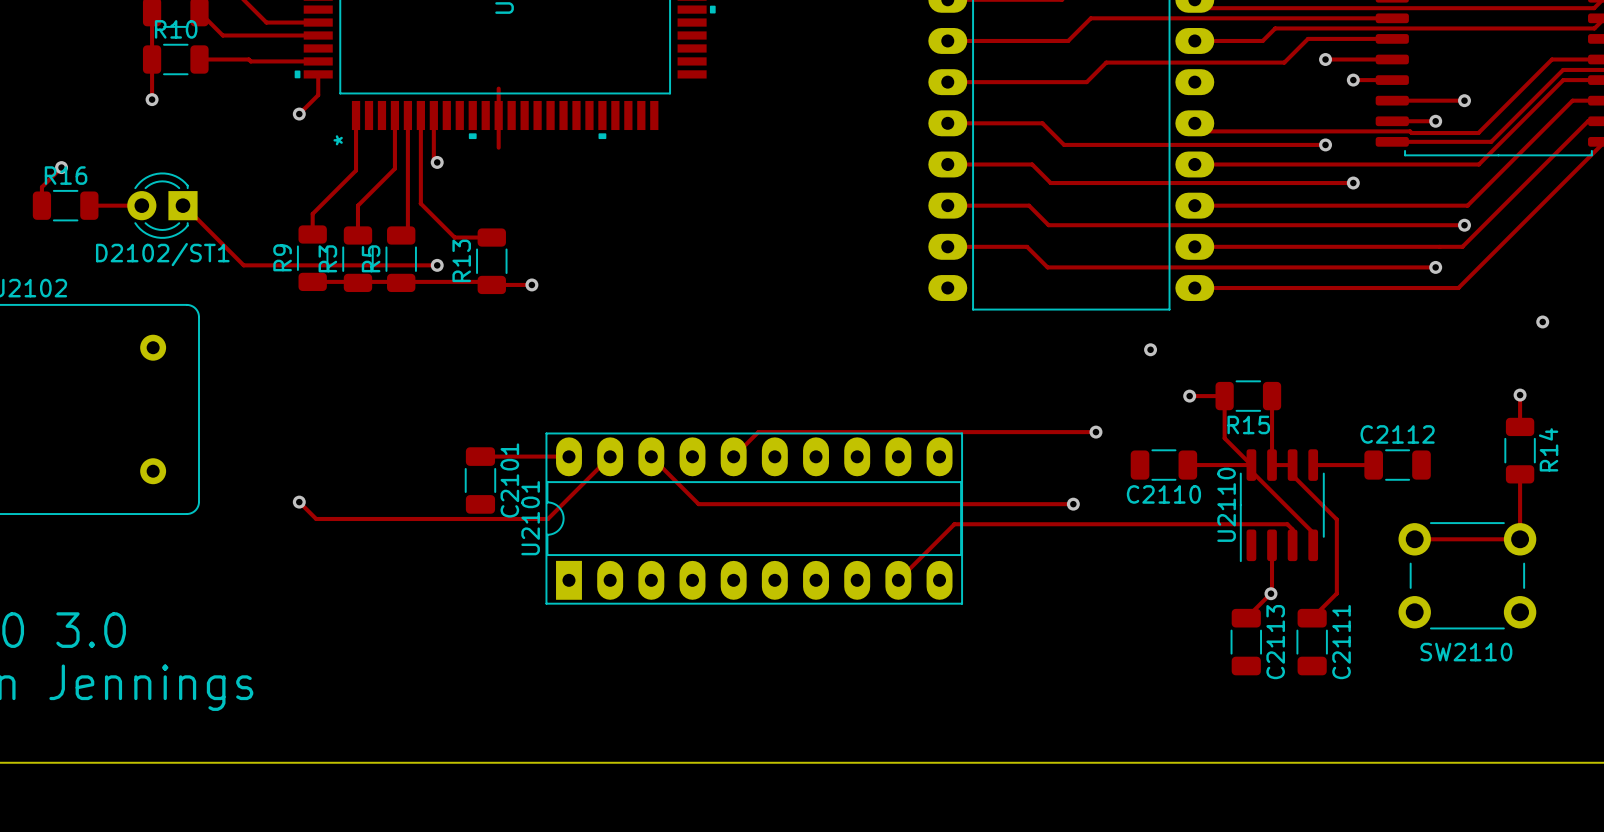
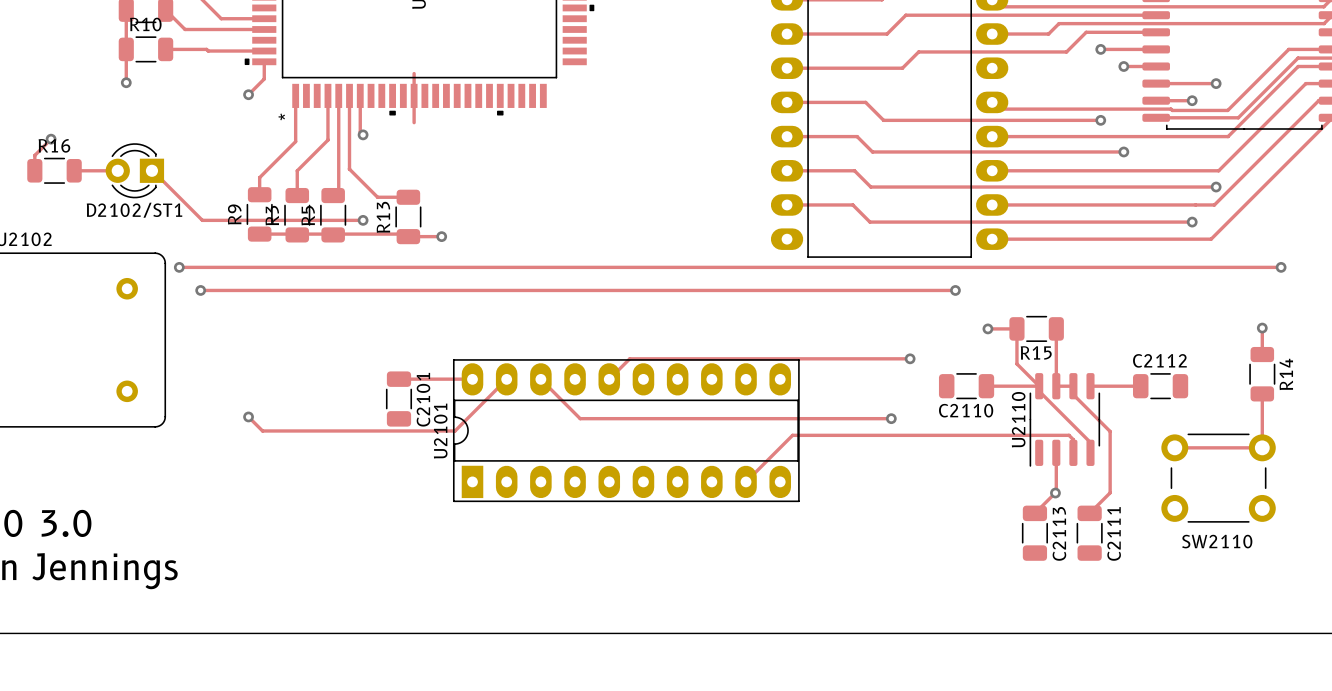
track: none -> (179, 267) (1281, 267)
via: none -> (179, 267)
track: none -> (200, 290) (955, 290)
via: none -> (200, 290)

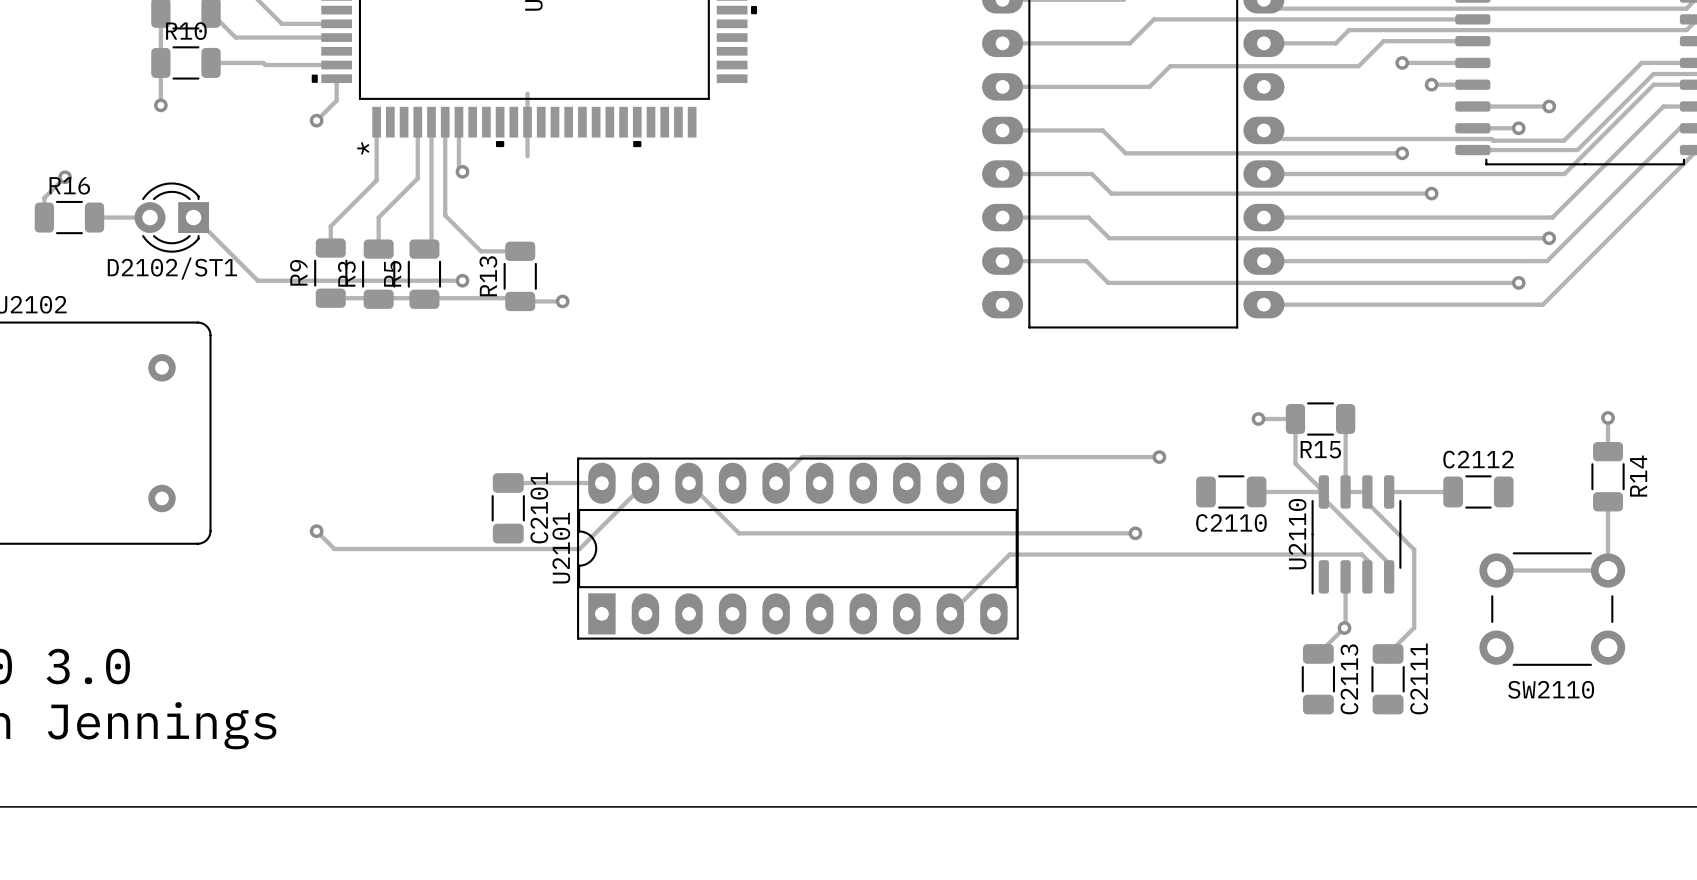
track: (179, 267) (1281, 267) -> none
via: (179, 267) -> none
via: (1281, 267) -> none
track: (200, 290) (955, 290) -> none
via: (200, 290) -> none
via: (955, 290) -> none

